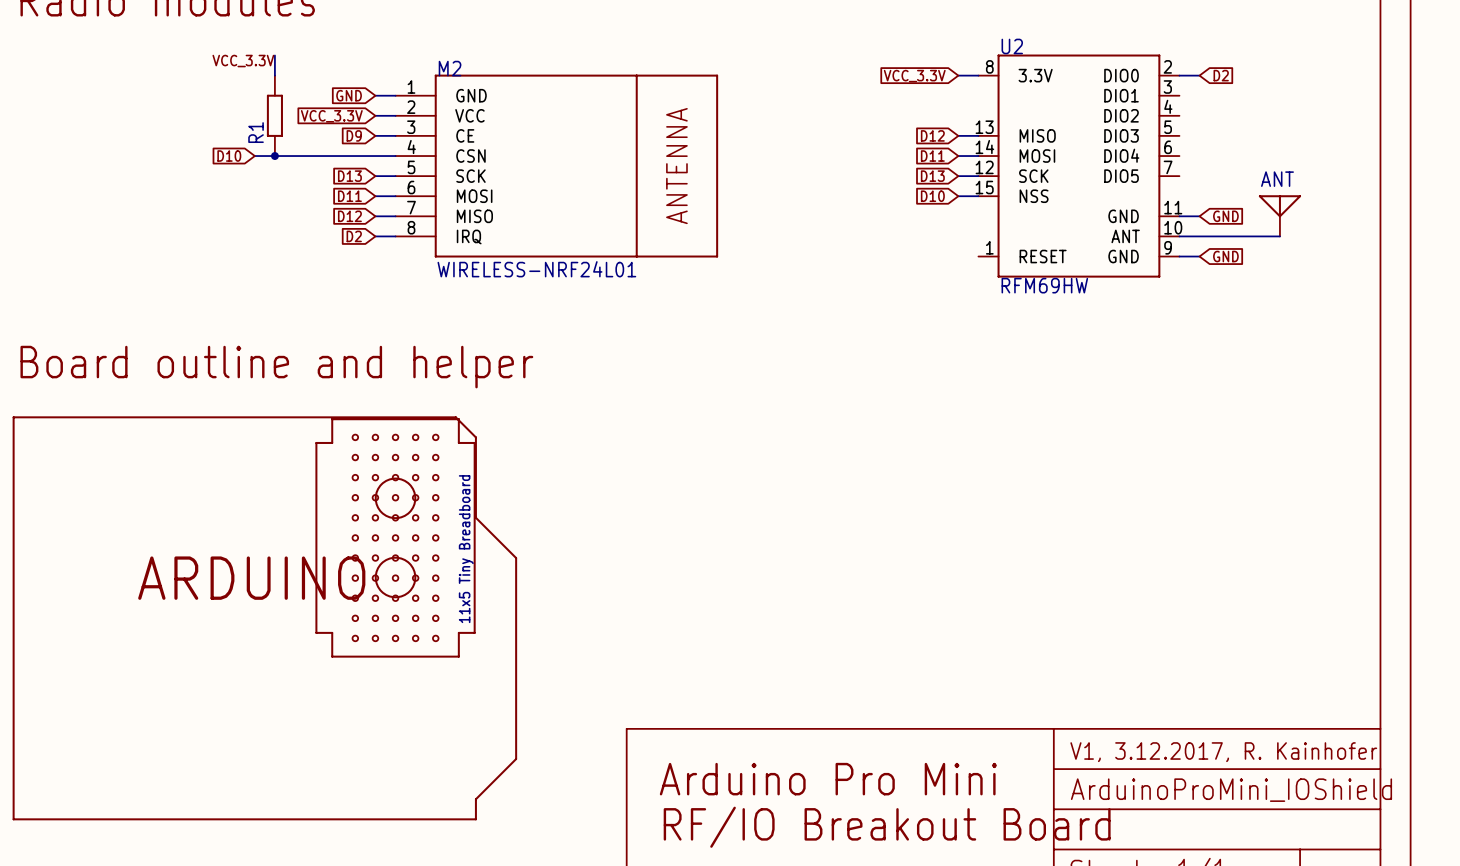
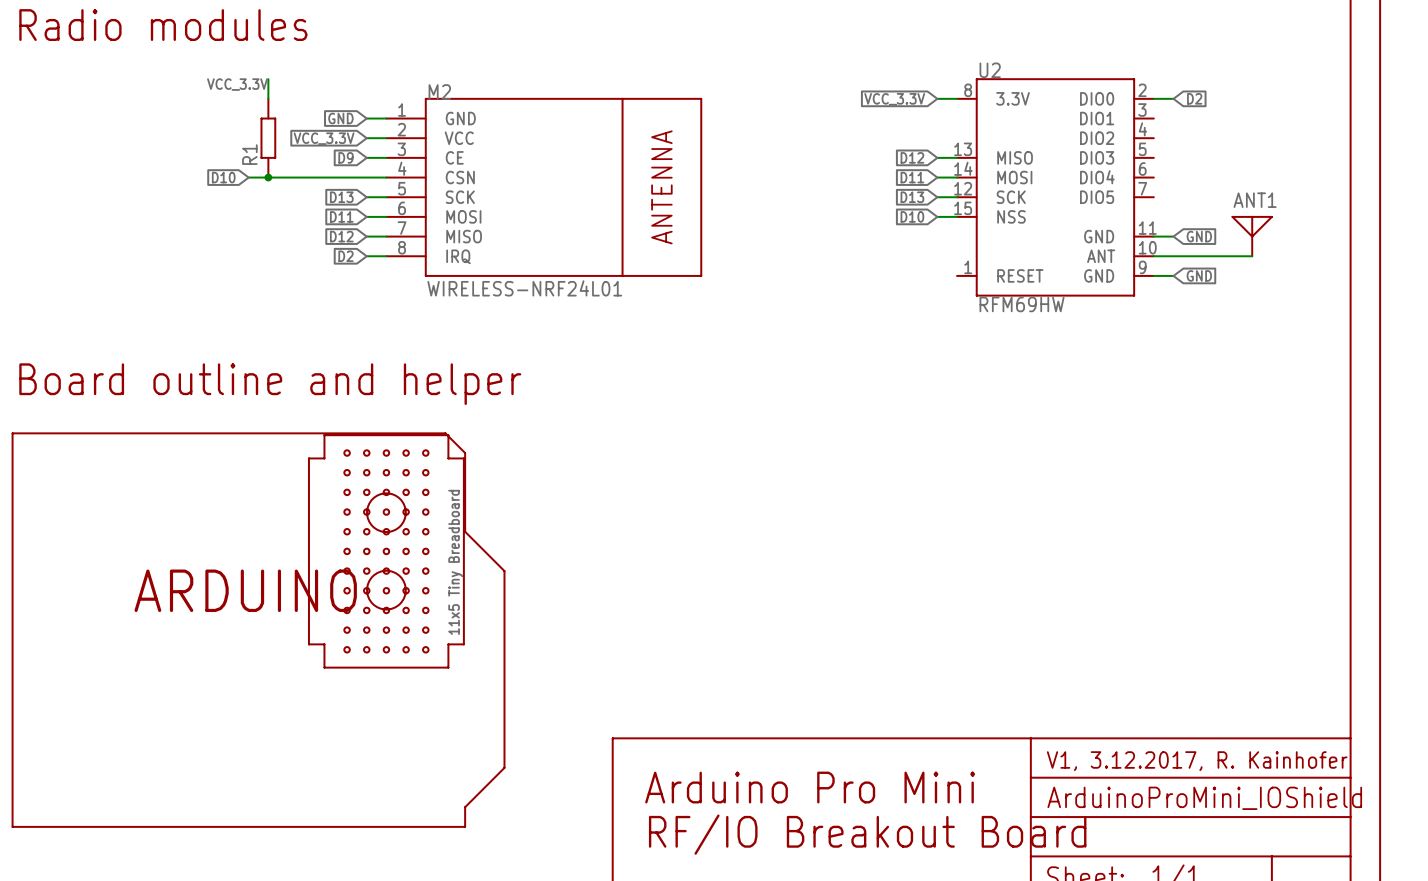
ANT name: ANT (1277, 179) -> ANT1 (1255, 200)

